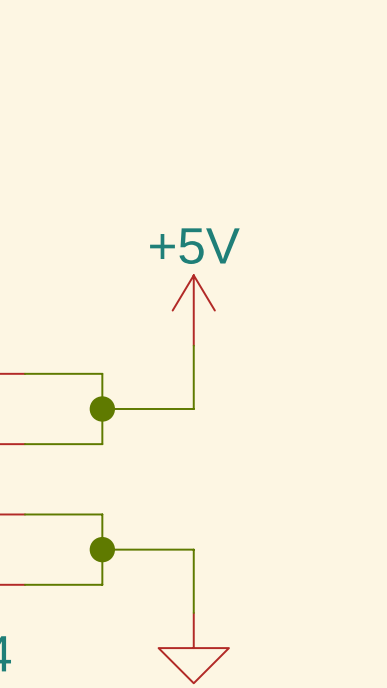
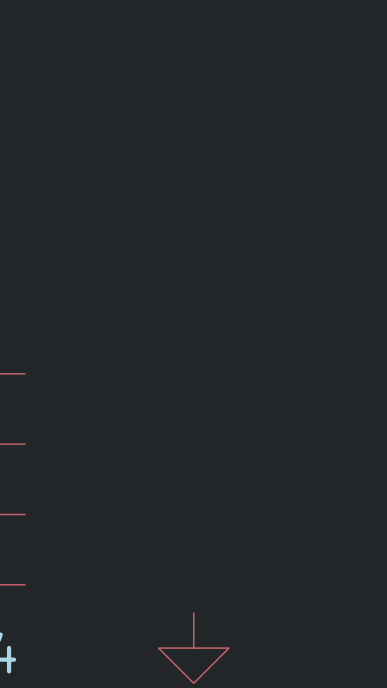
power symbol: +5V (193, 310) -> none
wire: (193, 345) (193, 408) (102, 408) -> none
wire: (24, 373) (102, 373) (102, 444) (24, 444) -> none
junction: (102, 408) -> none
wire: (24, 514) (102, 514) (102, 584) (24, 584) -> none
wire: (102, 549) (193, 549) (193, 612) -> none
junction: (102, 549) -> none

